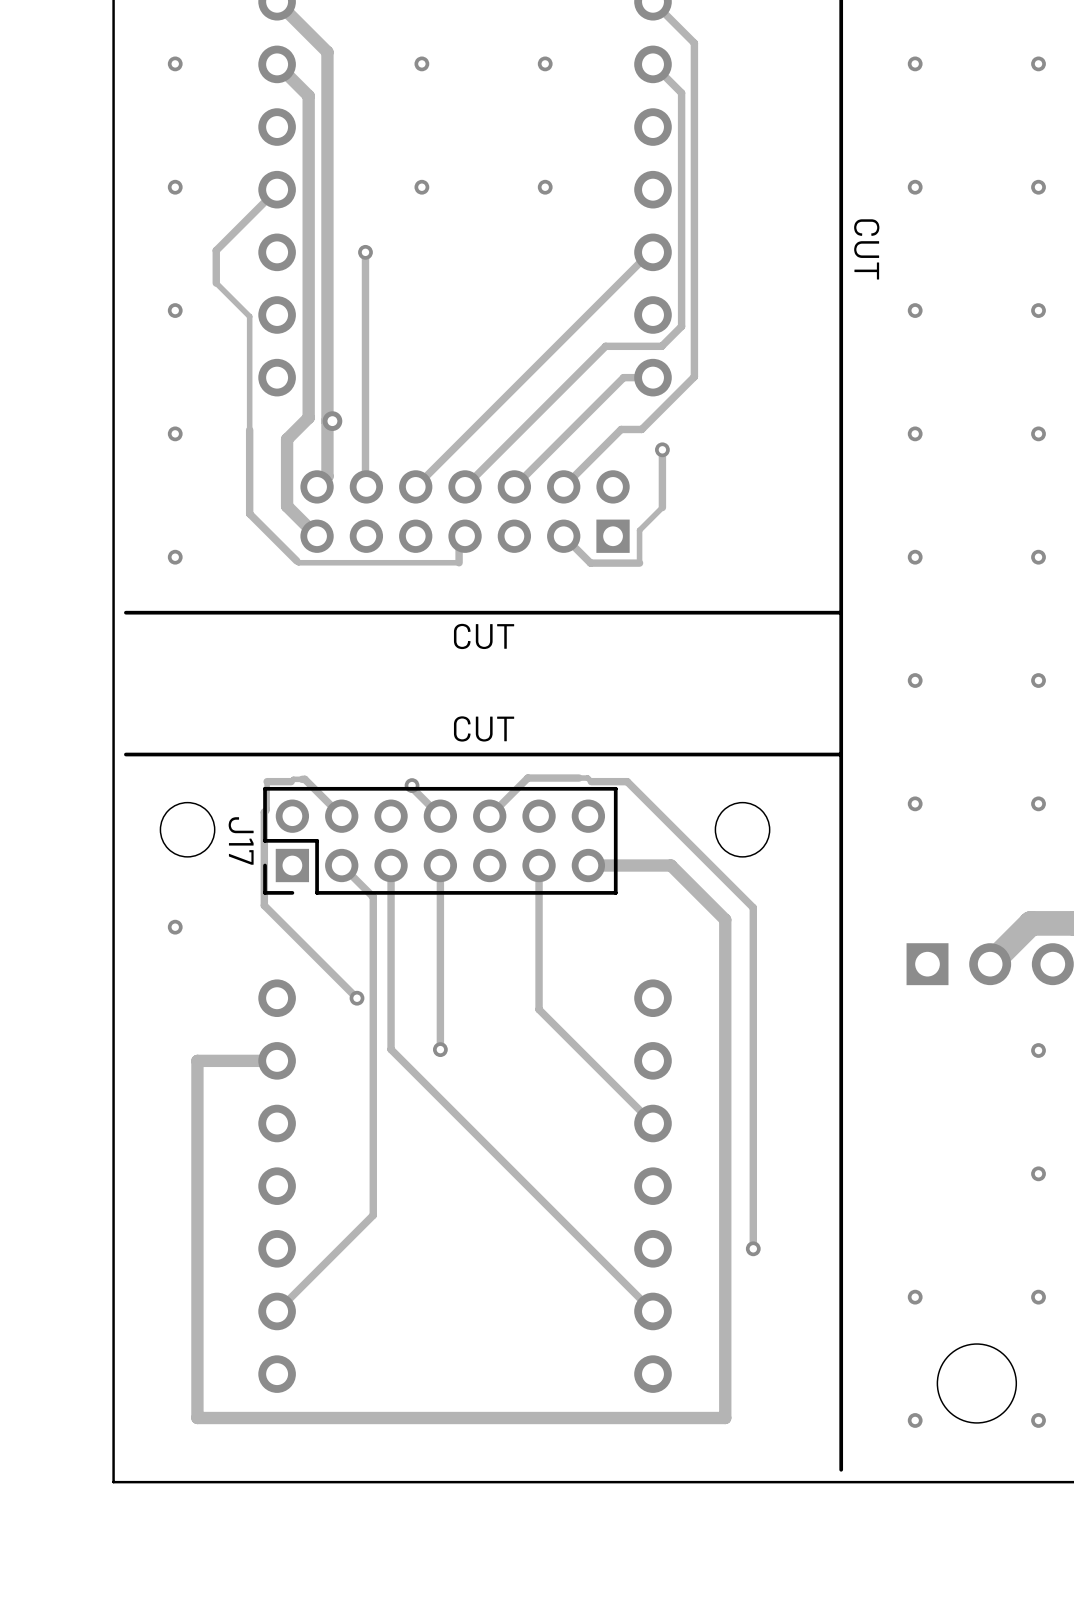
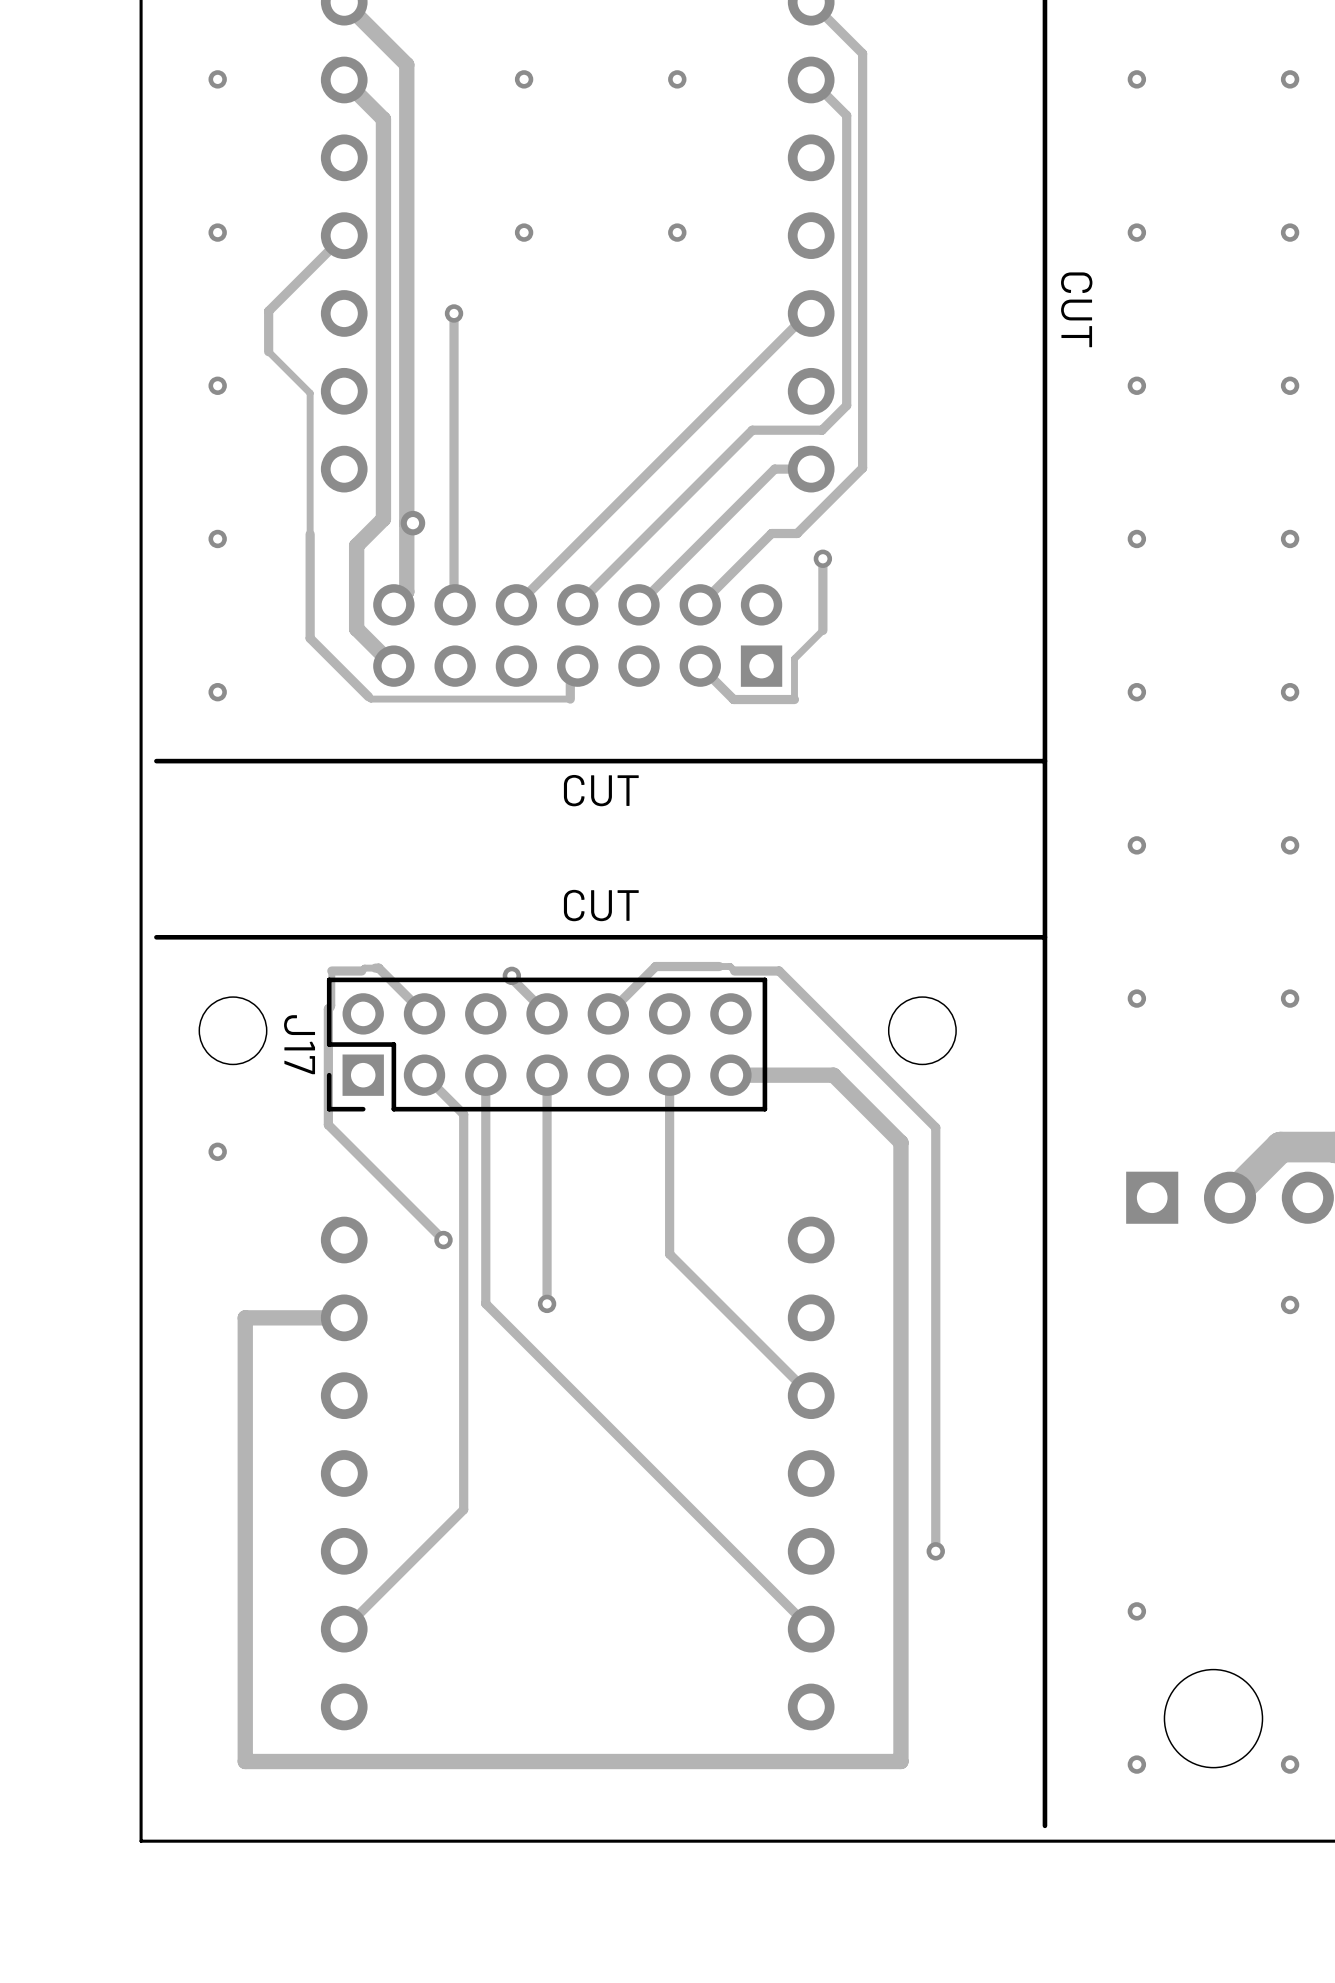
via: (1038, 1173) -> none
via: (1038, 1297) -> none

